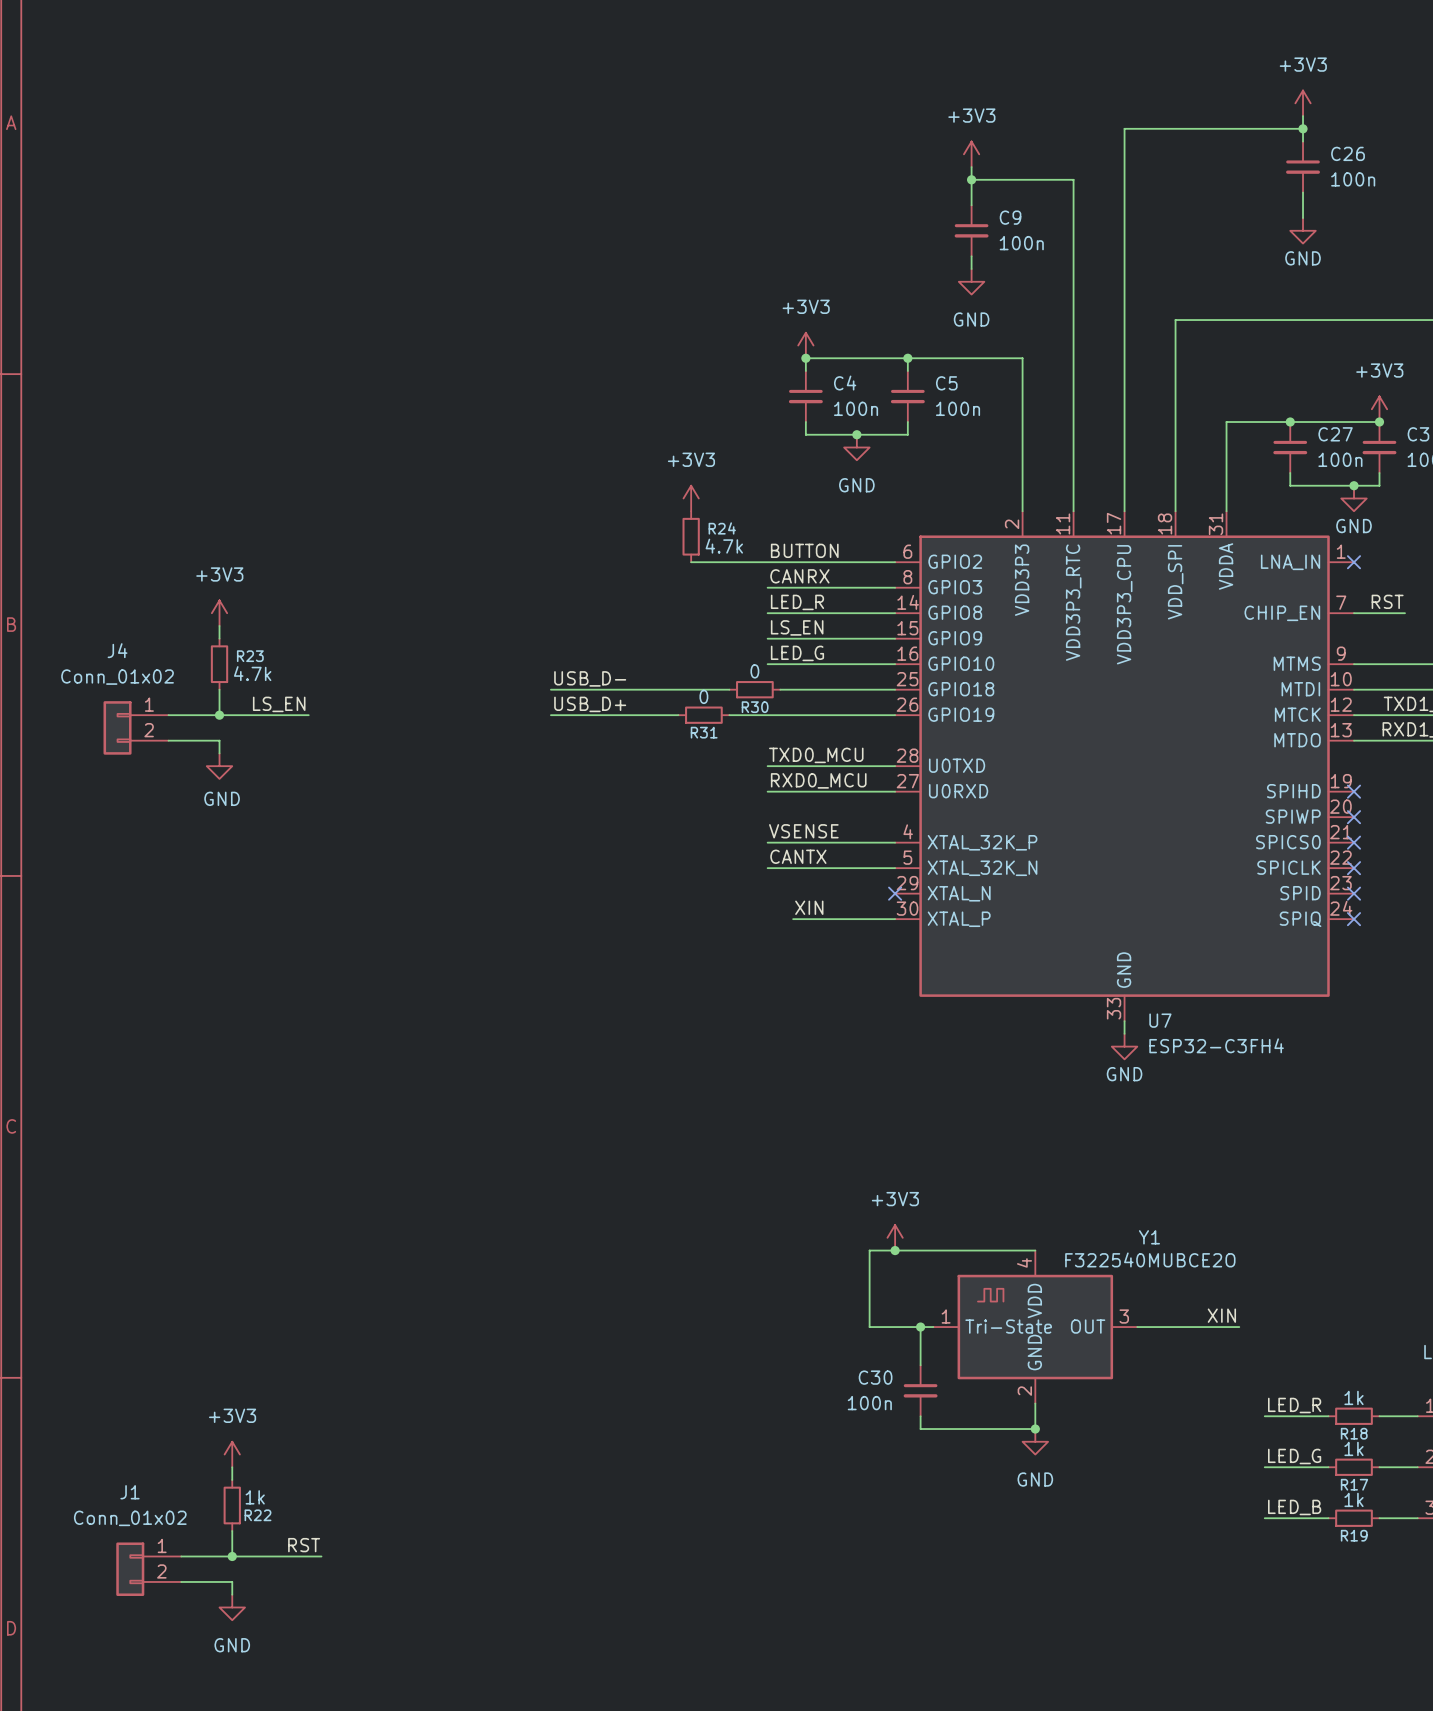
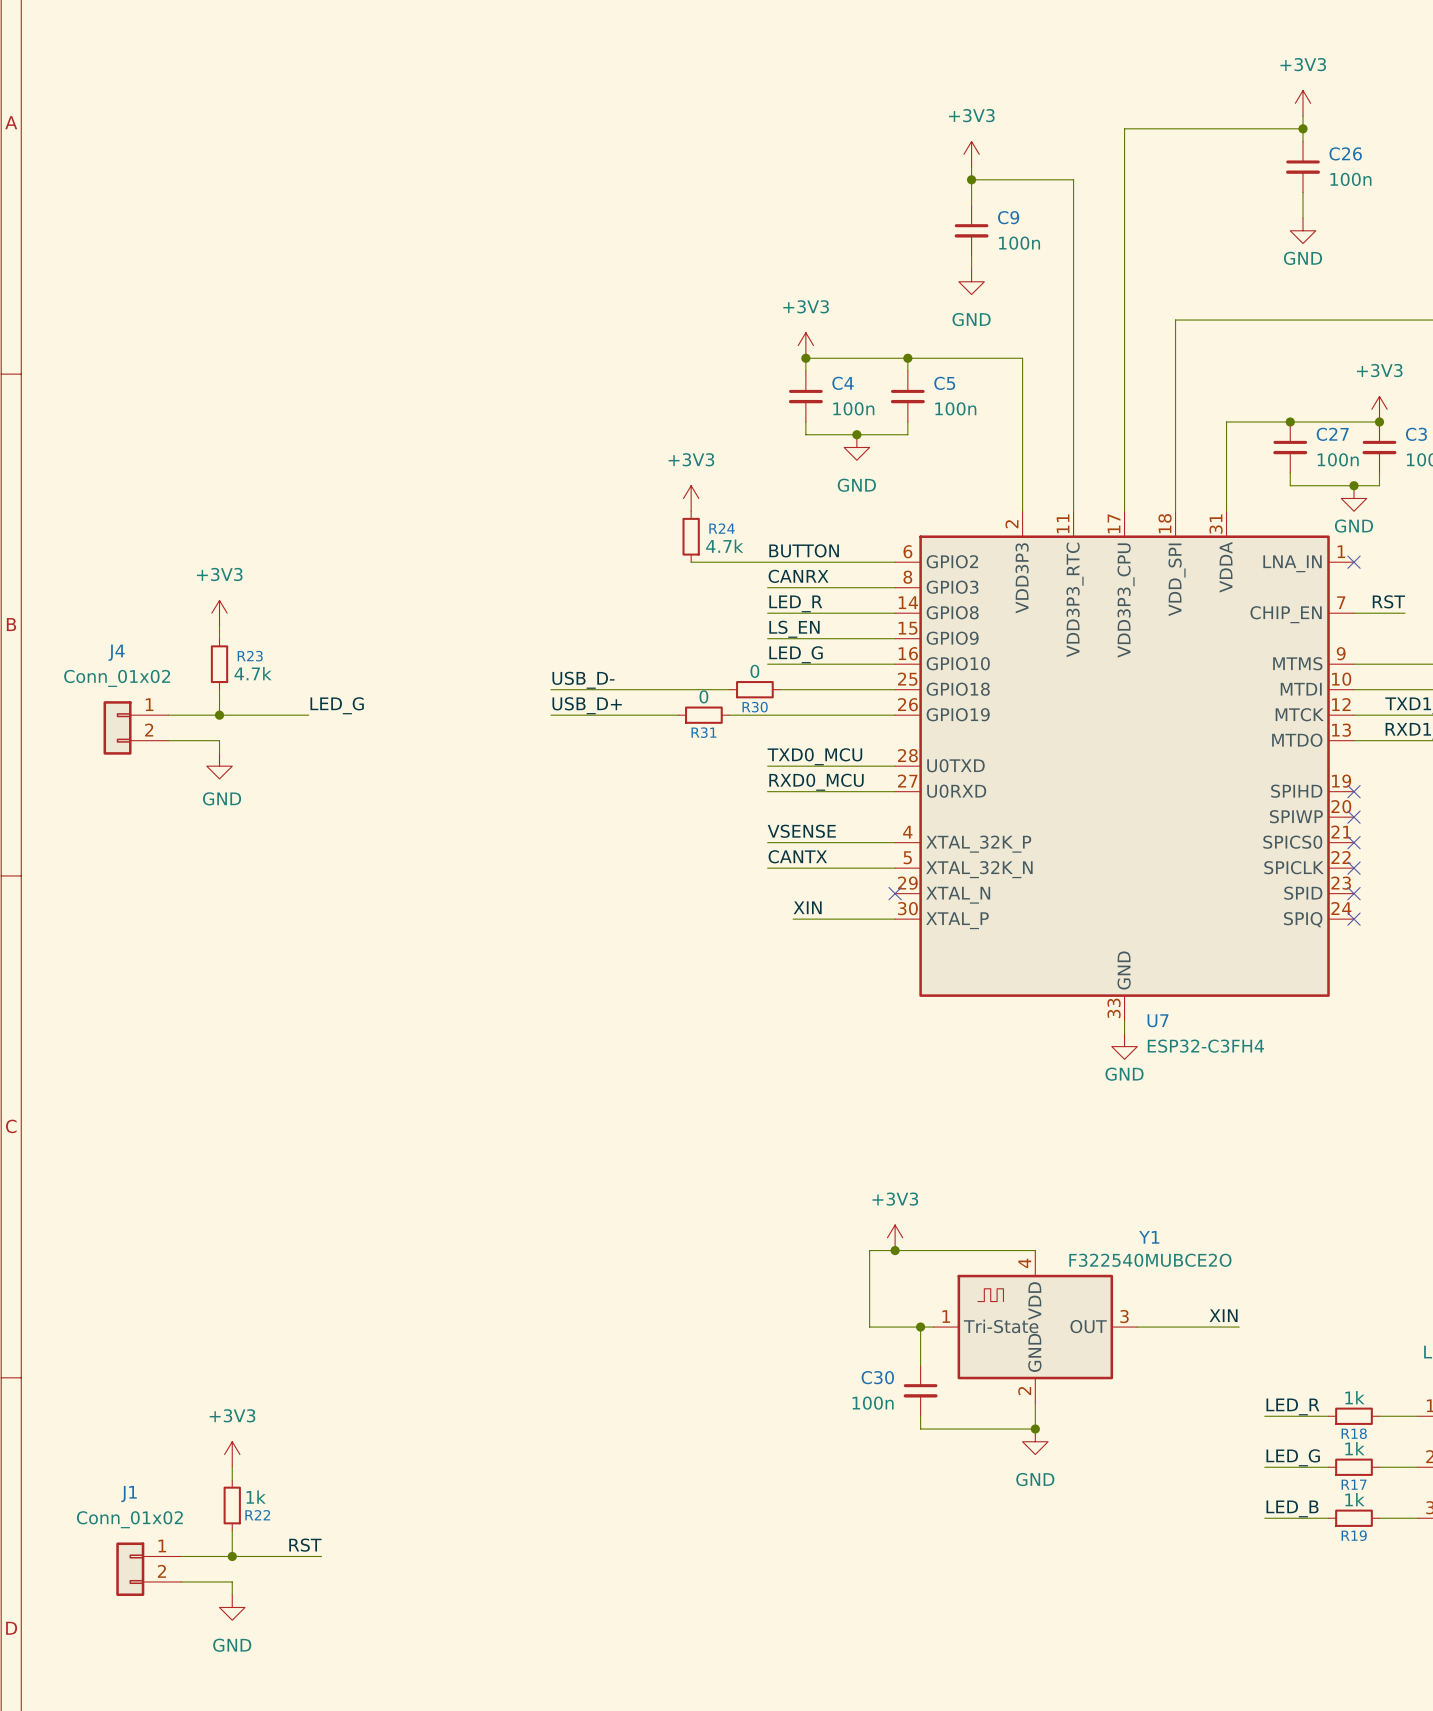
label: LS_EN (279, 704) -> LED_G (337, 705)

